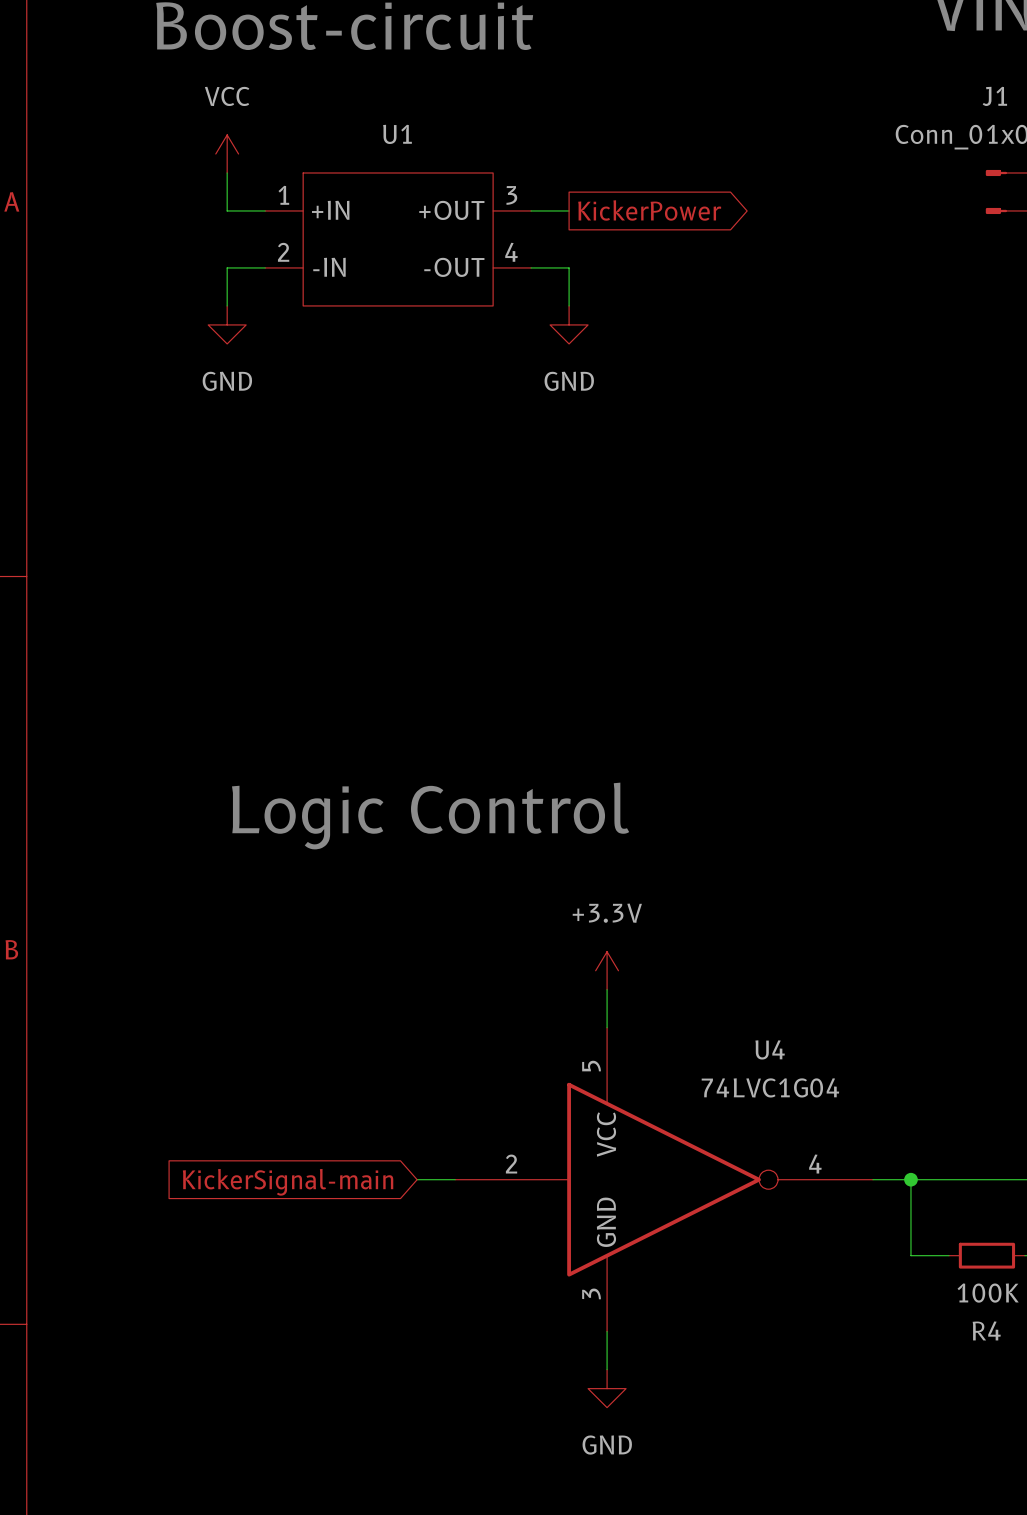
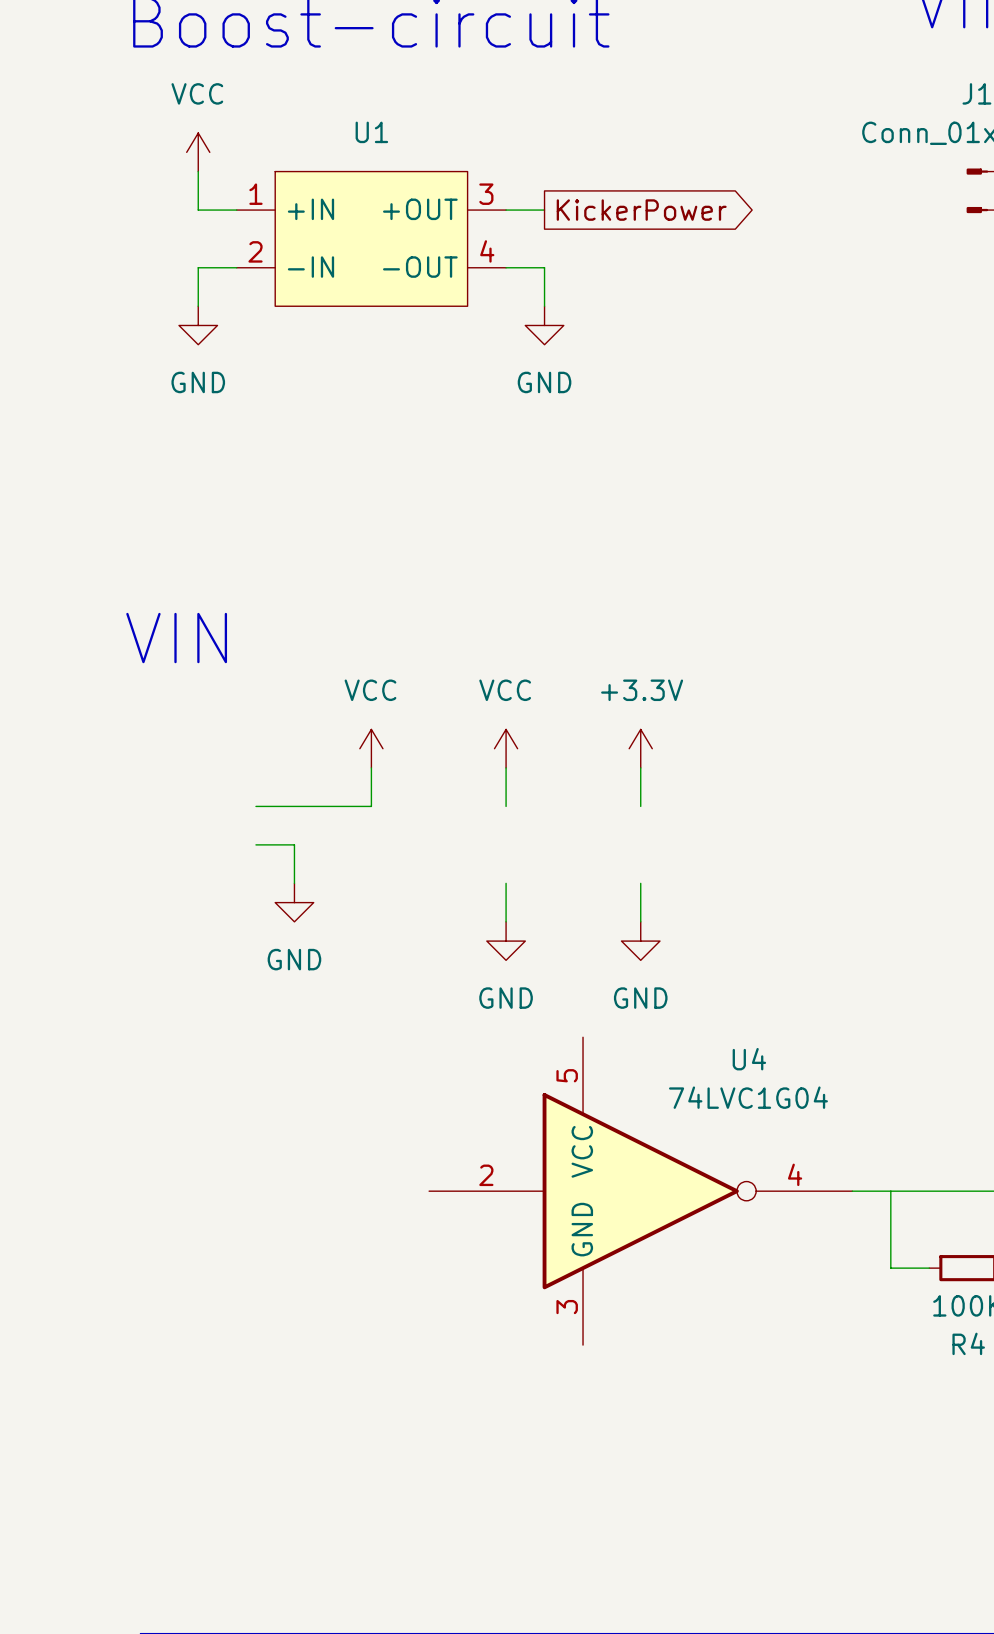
text: none -> VIN (176, 638)
power symbol: none -> VCC (371, 748)
power symbol: none -> VCC (506, 748)
wire: none -> (371, 767) (371, 806) (255, 806)
wire: none -> (506, 767) (506, 806)
wire: none -> (640, 767) (640, 806)
text: Logic Control (430, 816) -> none
wire: none -> (255, 844) (294, 844) (294, 883)
wire: none -> (506, 883) (506, 921)
power symbol: none -> GND (294, 902)
power symbol: none -> GND (506, 941)
power symbol: none -> GND (640, 941)
power symbol position: +3.3V (607, 970) -> +3.3V (640, 748)
wire: (607, 989) (607, 1027) -> (640, 883) (640, 921)
wire: (417, 1179) (455, 1179) -> none
junction: (910, 1179) -> none
global label: KickerSignal-main (288, 1182) -> none
wire: (607, 1331) (607, 1369) -> none
power symbol: GND (607, 1388) -> none

